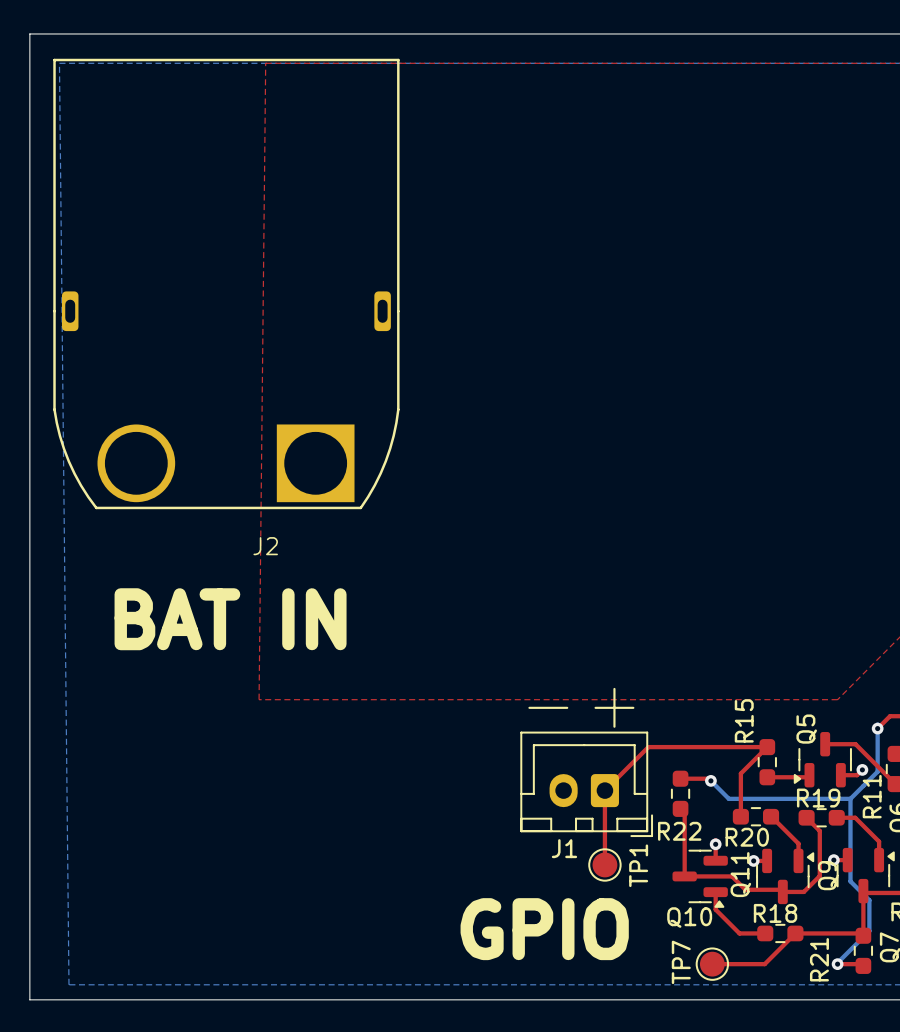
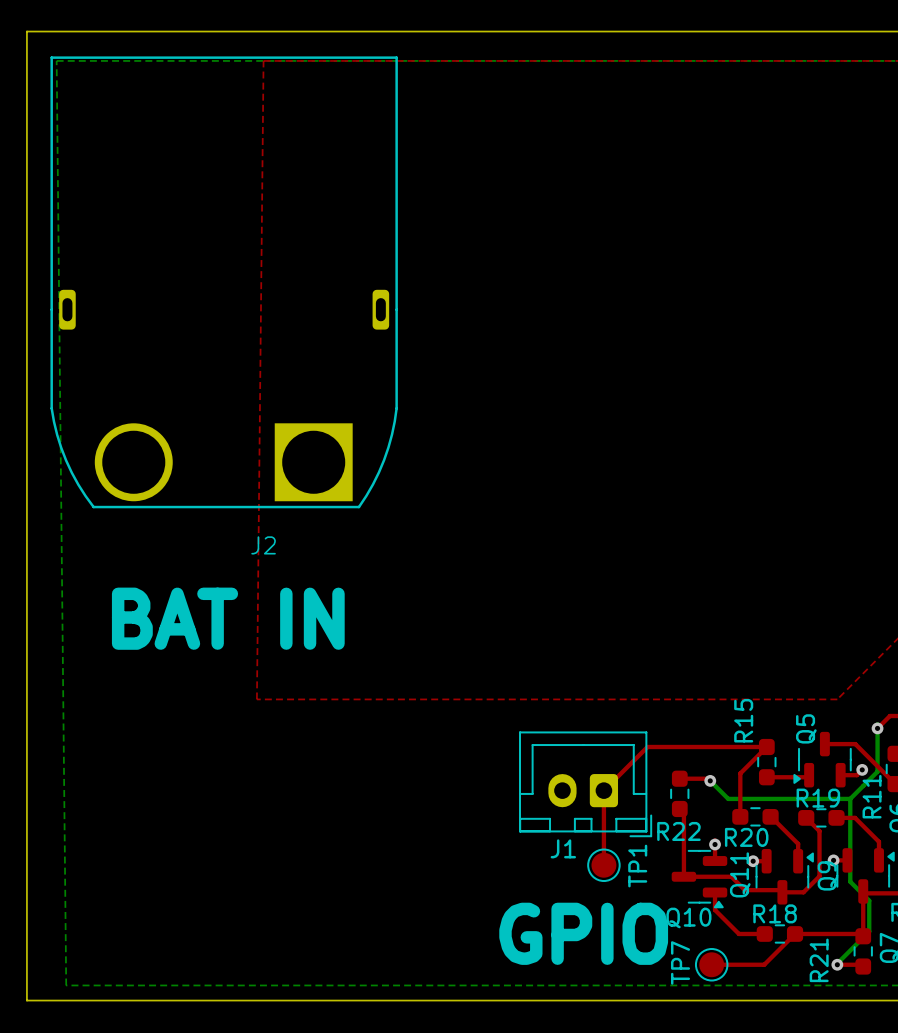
text: - (548, 707) -> none
text: + (614, 707) -> none
text position: GPIO (544, 929) -> GPIO (583, 933)

